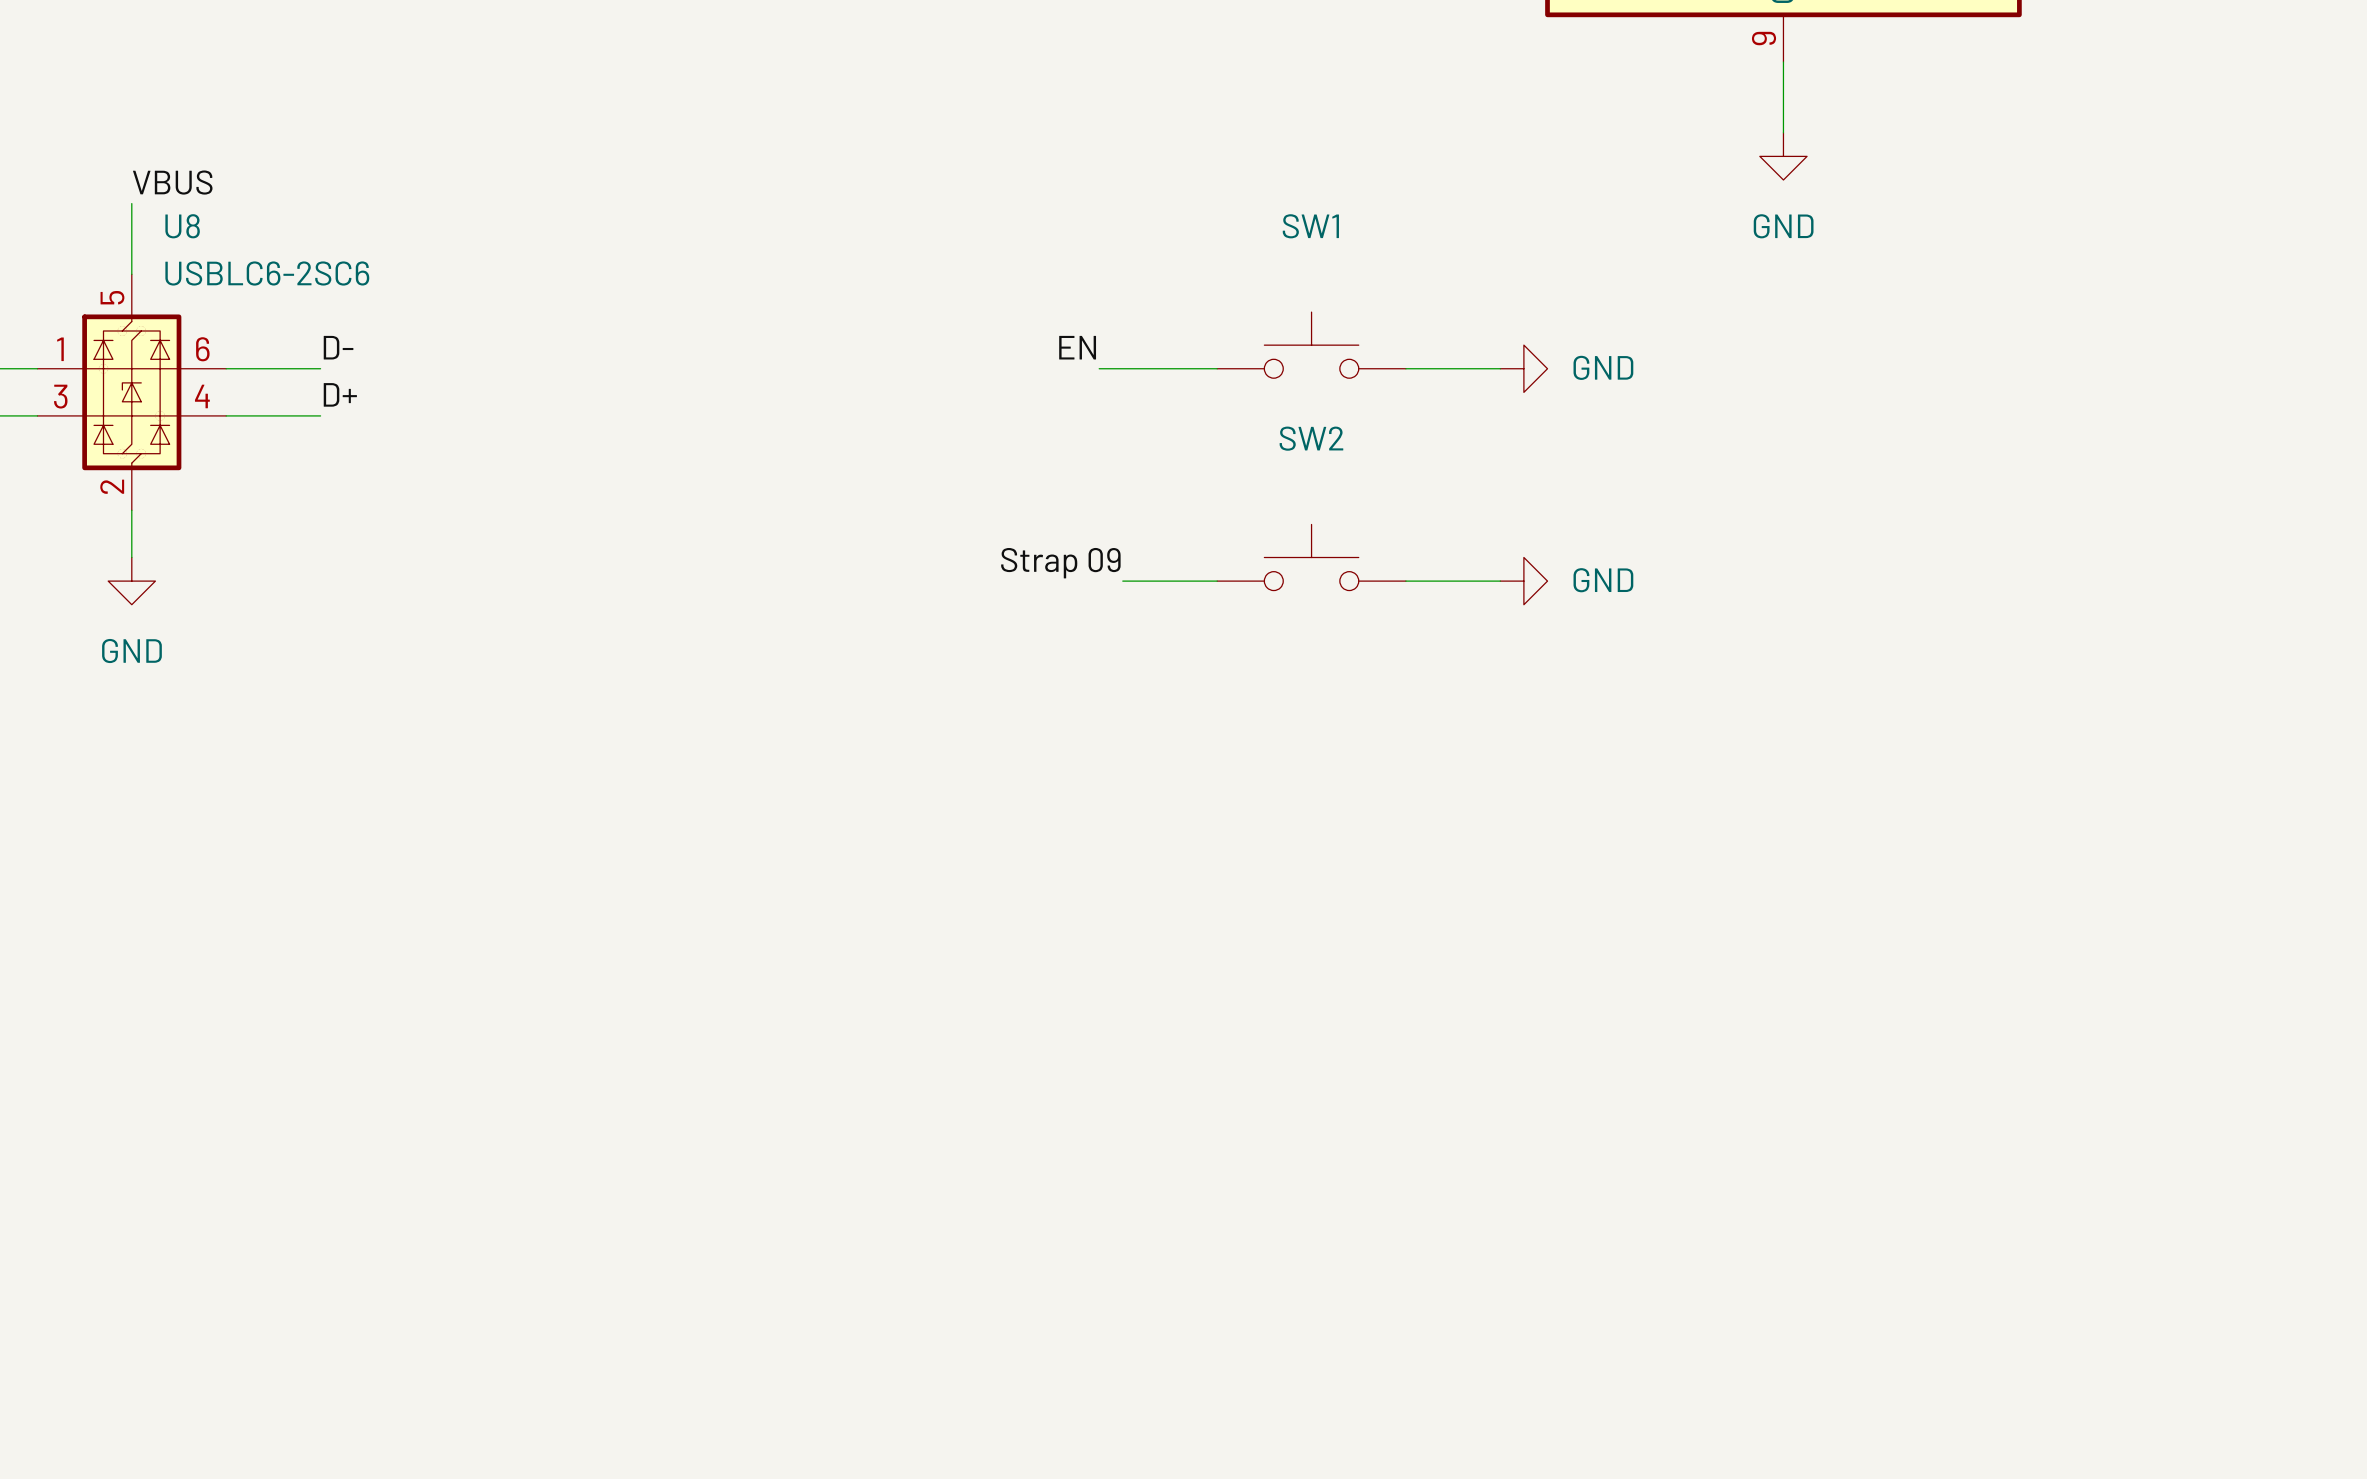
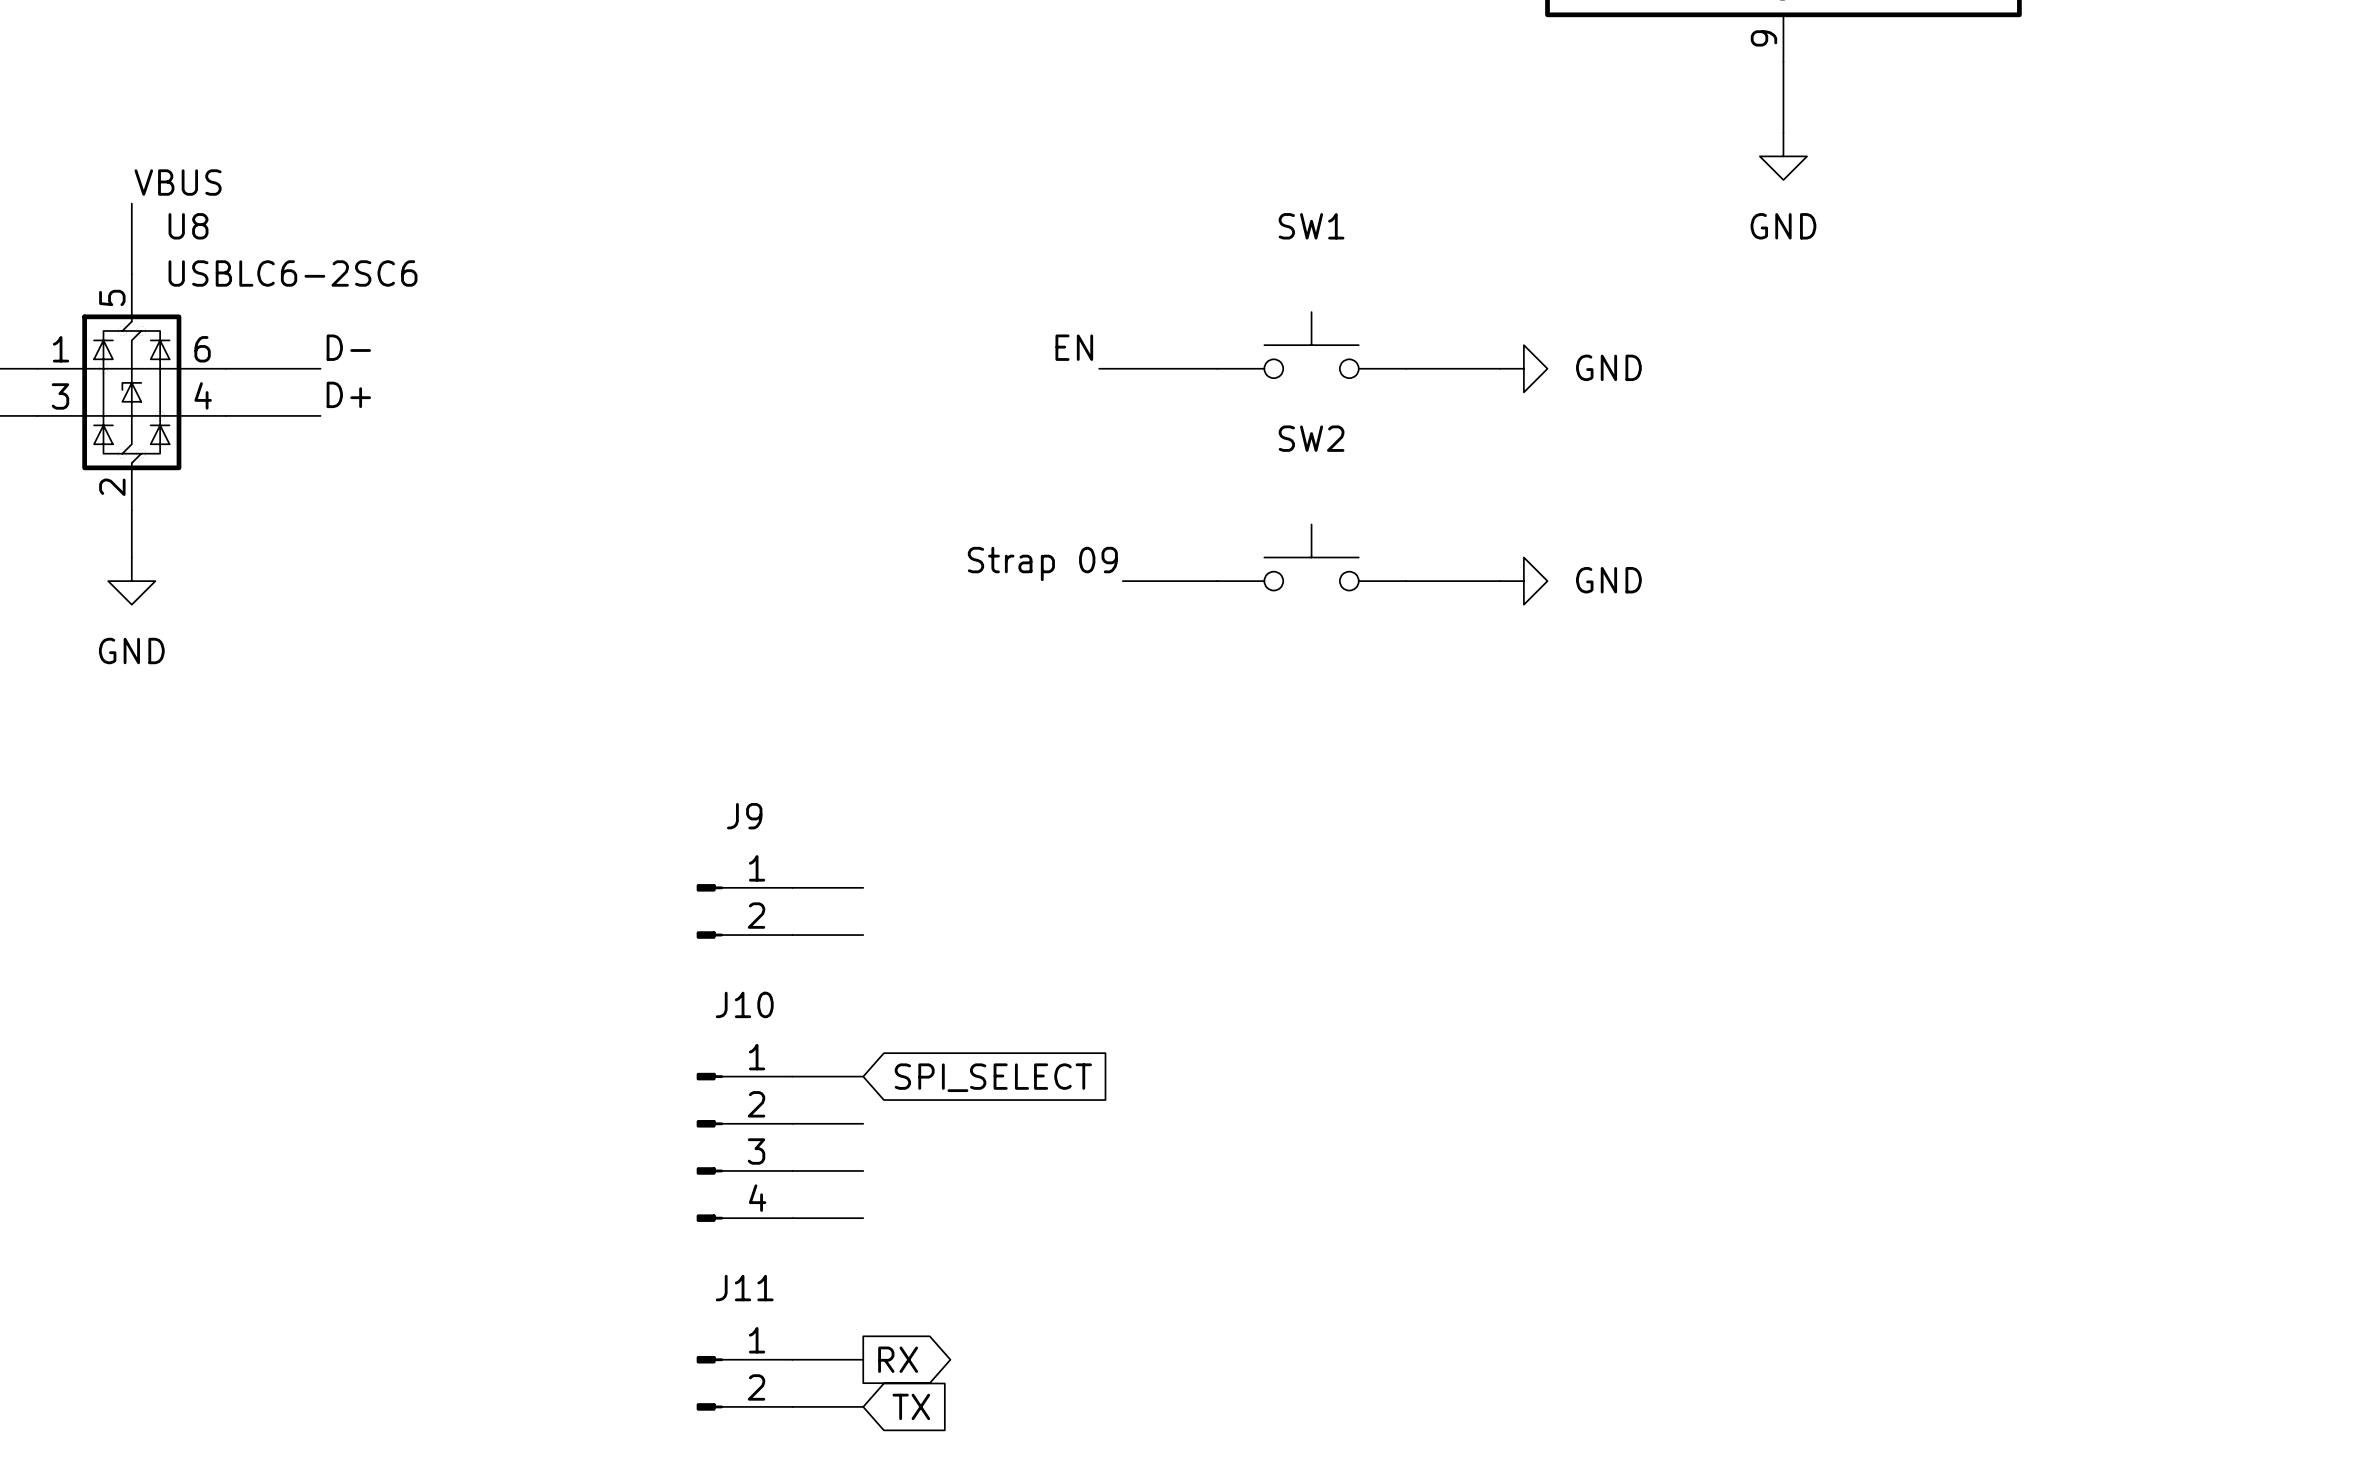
wire: none -> (792, 887) (863, 887)
J9: none -> (744, 911)
wire: none -> (792, 935) (863, 935)
wire: none -> (792, 1076) (863, 1076)
global label: none -> SPI_SELECT (993, 1077)
wire: none -> (792, 1123) (863, 1123)
J10: none -> (744, 1147)
wire: none -> (792, 1170) (863, 1170)
wire: none -> (792, 1218) (863, 1218)
wire: none -> (792, 1359) (863, 1359)
global label: none -> RX (898, 1359)
J11: none -> (744, 1383)
wire: none -> (792, 1406) (863, 1406)
global label: none -> TX (911, 1406)

